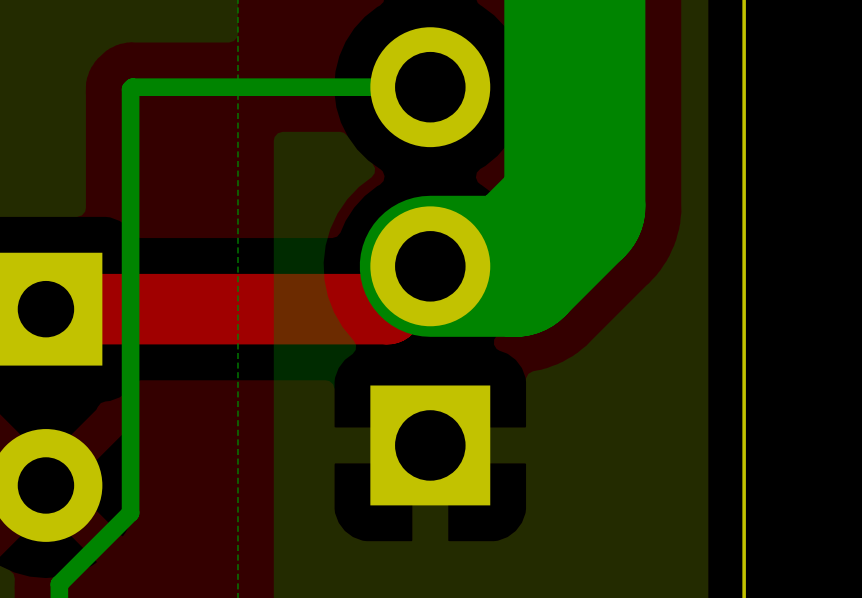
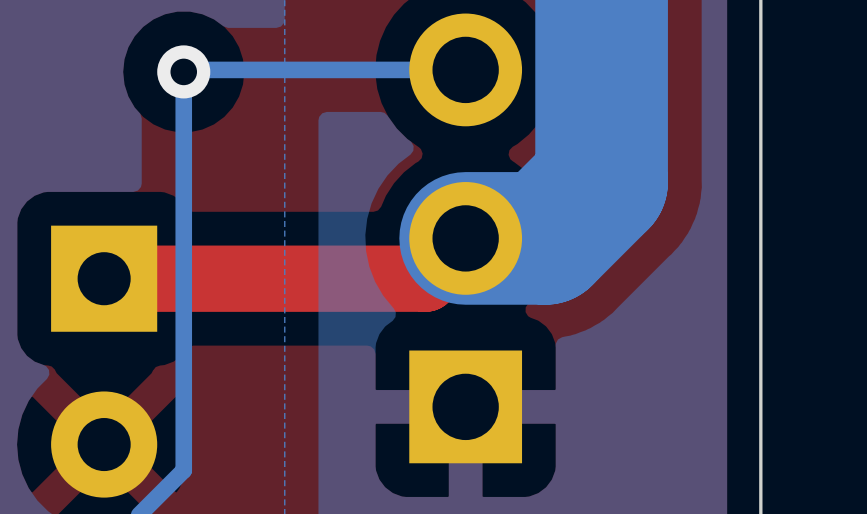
via: none -> (183, 71)

